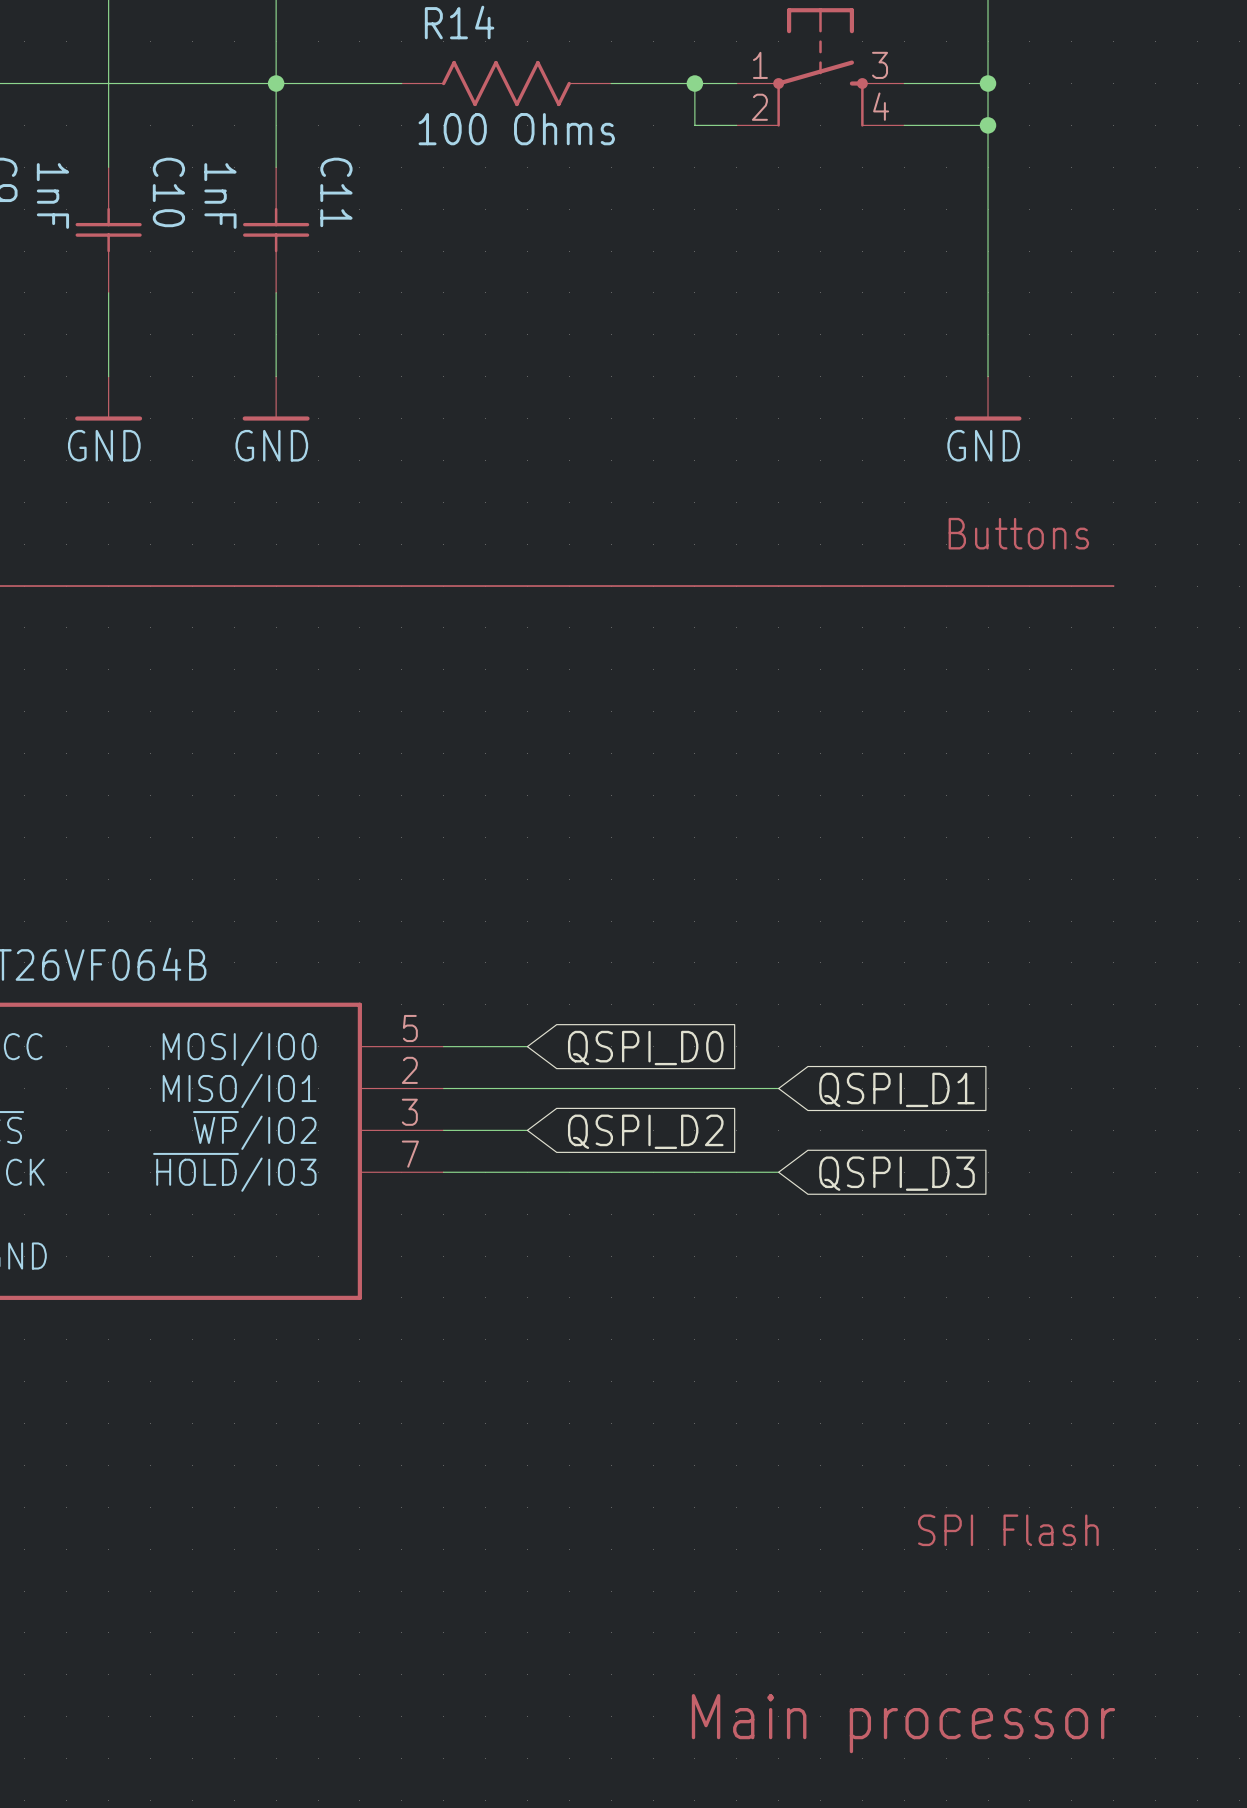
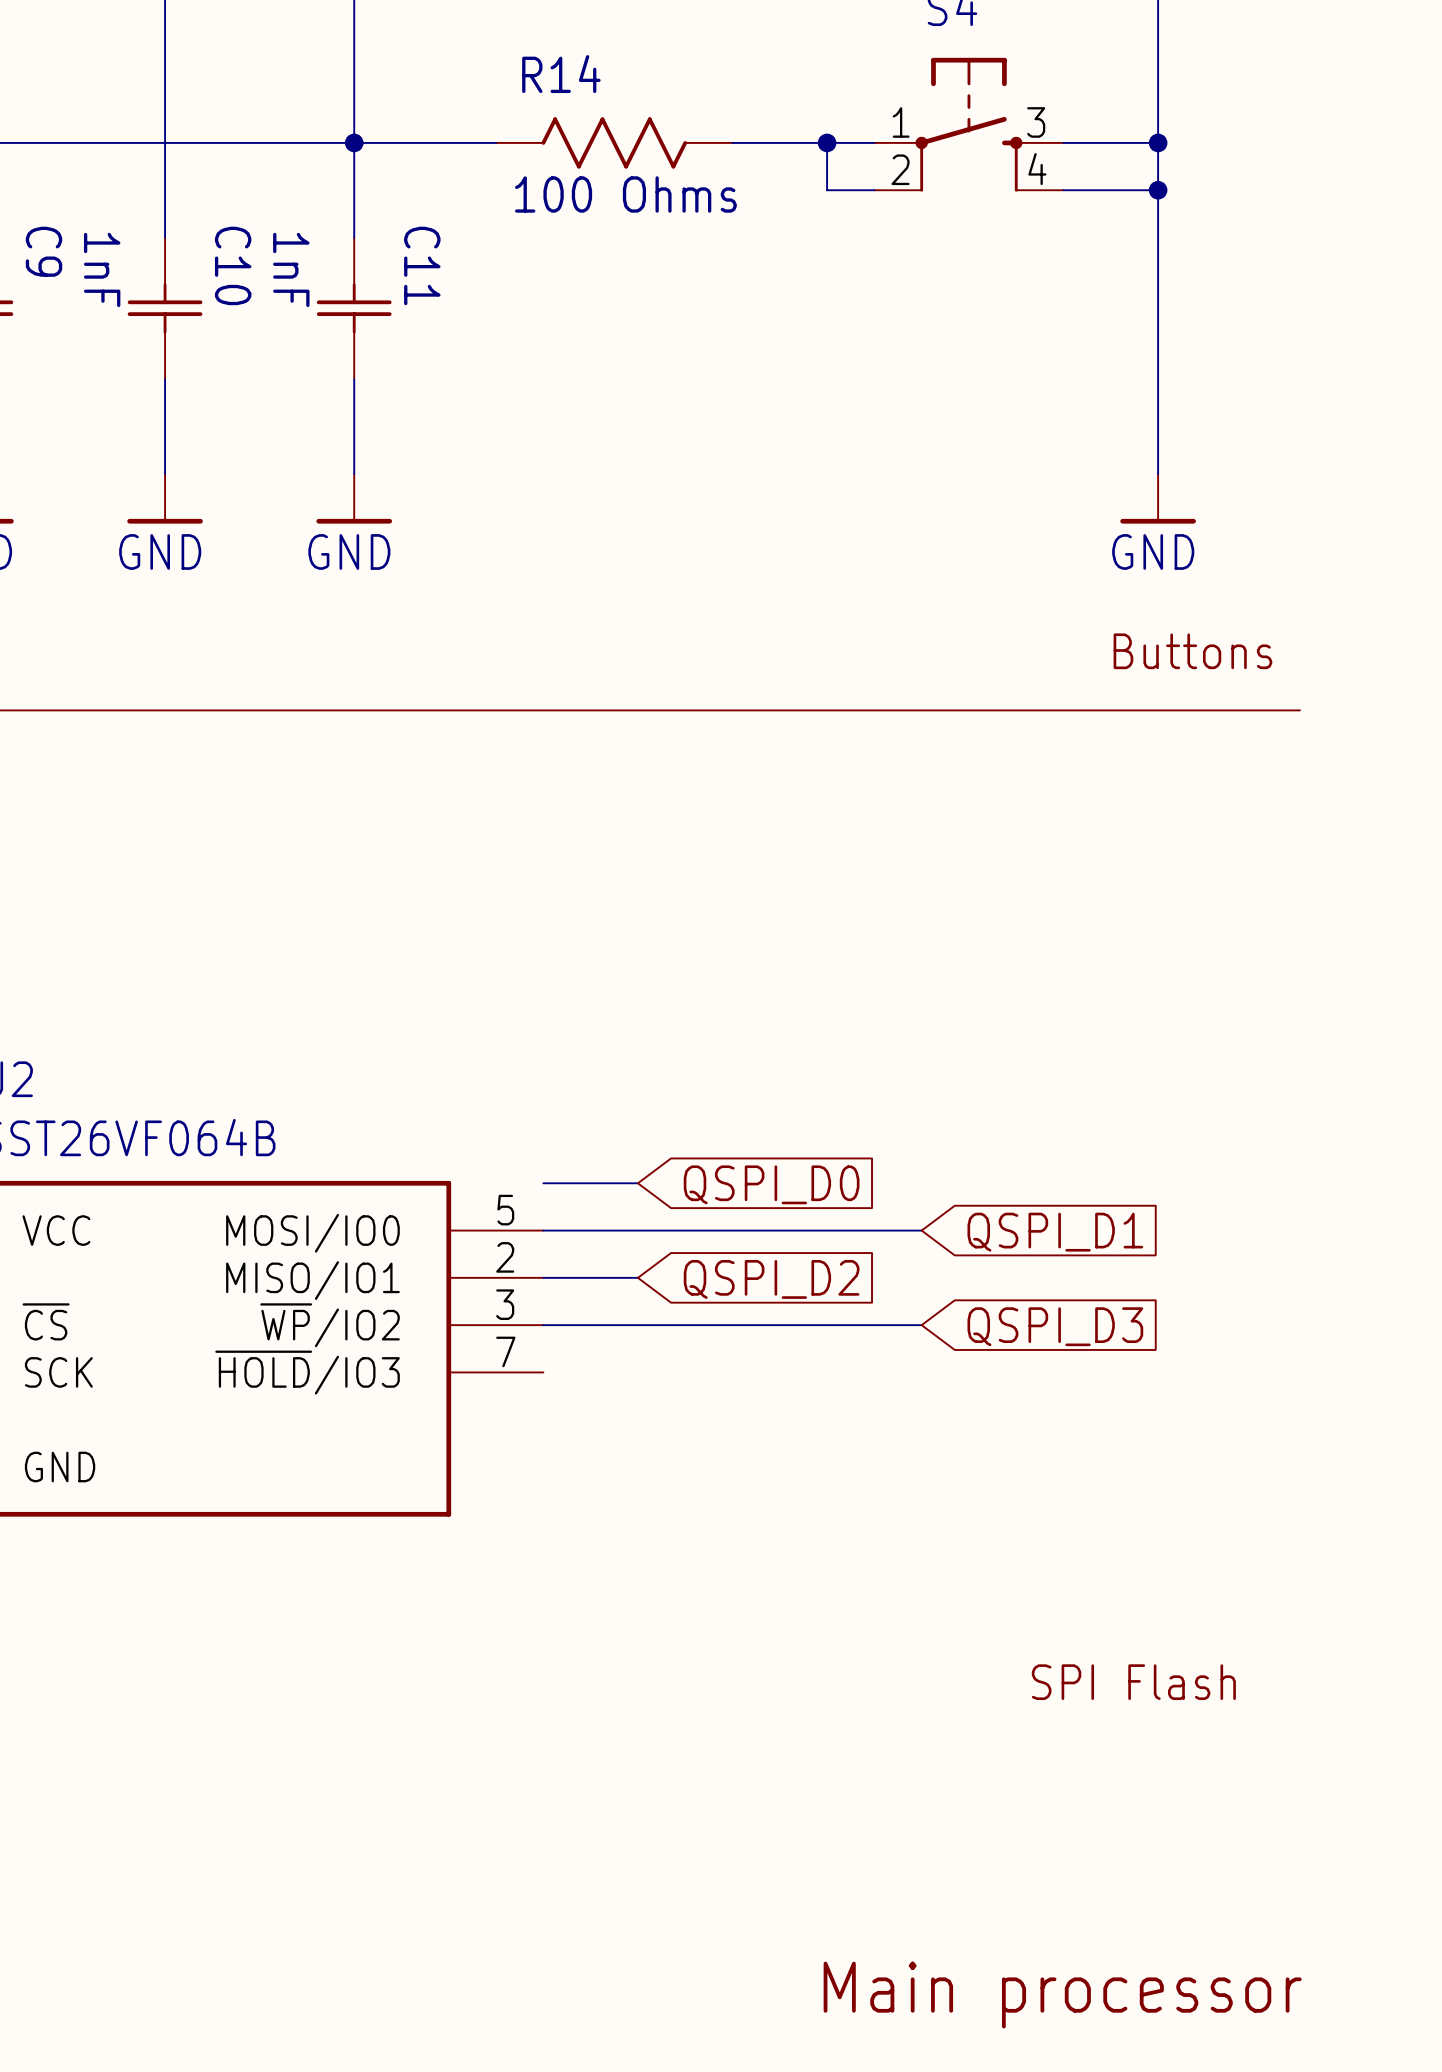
wire: none -> (543, 1183) (637, 1183)
global label position: QSPI_D0 (645, 1048) -> QSPI_D0 (771, 1184)
wire: (527, 1088) (778, 1088) -> (637, 1230) (921, 1230)
global label position: QSPI_D1 (897, 1089) -> QSPI_D1 (1055, 1232)
wire: none -> (637, 1325) (921, 1325)
global label position: QSPI_D2 (645, 1131) -> QSPI_D2 (771, 1279)
wire: (443, 1172) (778, 1172) -> none
global label position: QSPI_D3 (897, 1173) -> QSPI_D3 (1055, 1326)
text position: SPI Flash (1008, 1530) -> SPI Flash (1133, 1682)

